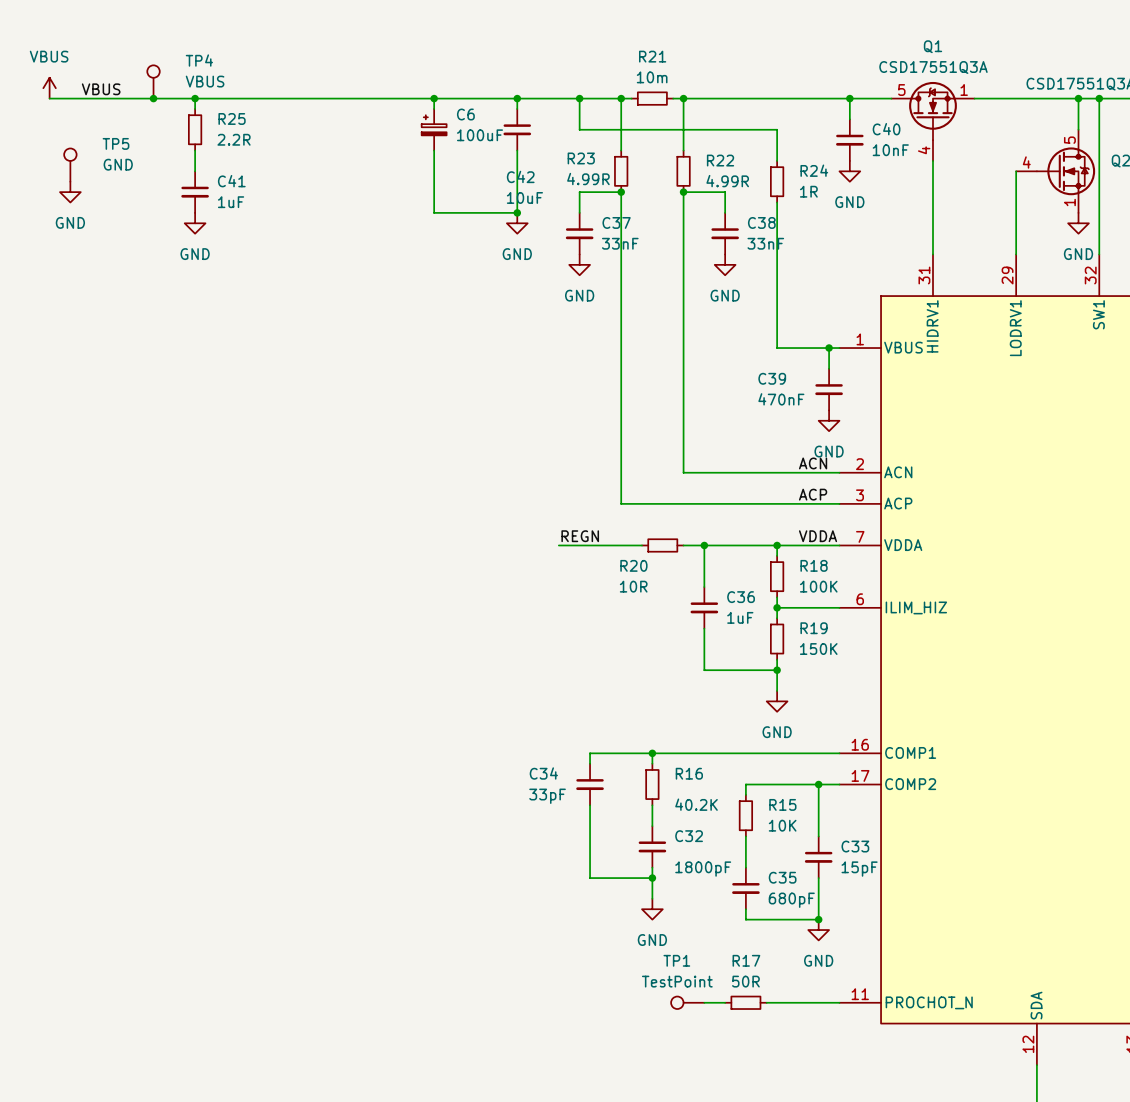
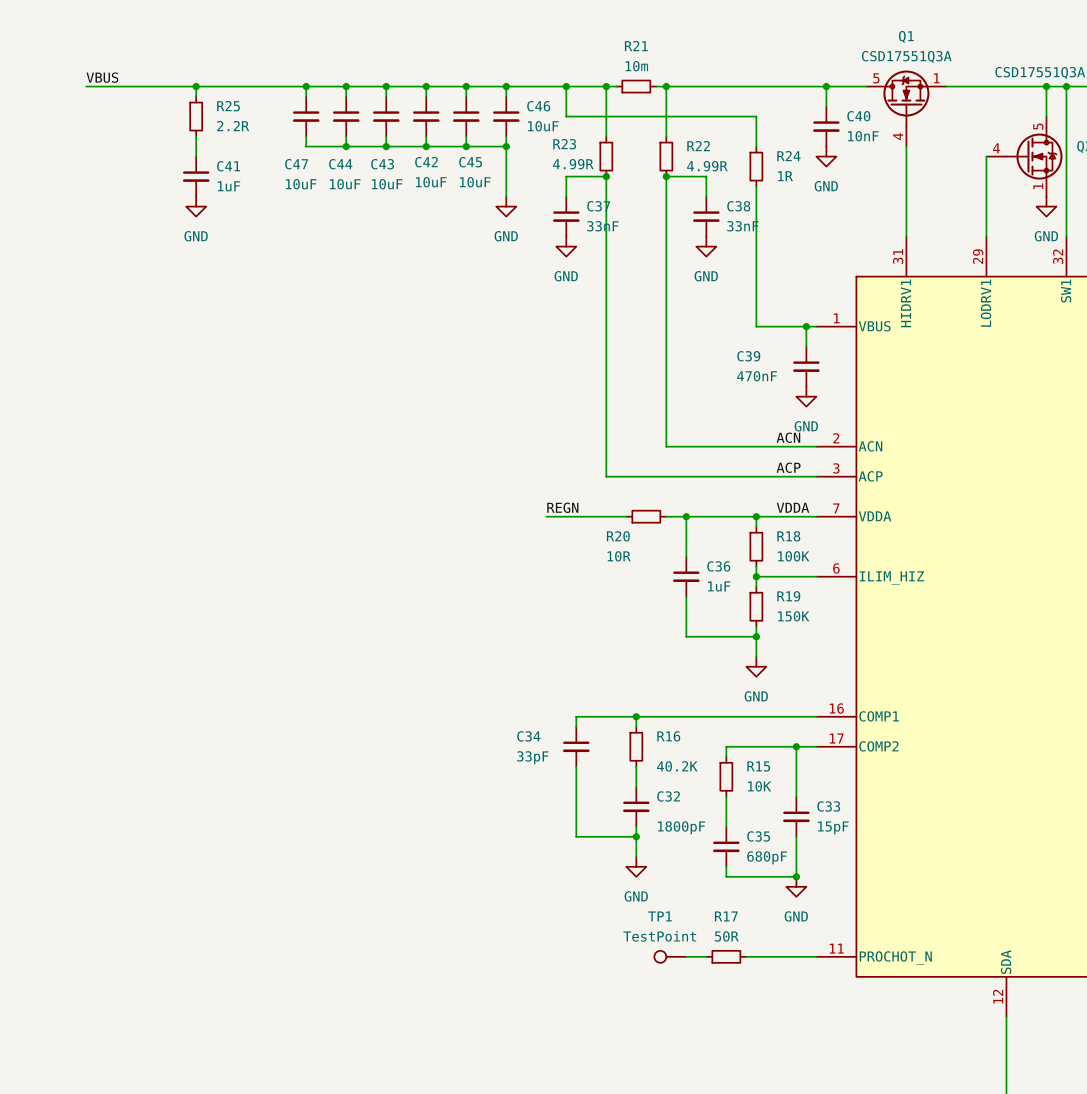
TP4: VBUS (153, 81) -> none
power symbol: VBUS (49, 88) -> none
wire: (49, 98) (80, 98) -> none
junction: (153, 98) -> none
wire: none -> (306, 86) (306, 96)
junction: none -> (306, 86)
wire: none -> (346, 86) (346, 96)
junction: none -> (346, 86)
wire: none -> (386, 86) (386, 96)
junction: none -> (386, 86)
wire: none -> (466, 86) (466, 96)
junction: none -> (466, 86)
C47: none -> 10uF (306, 116)
C44: none -> 10uF (346, 116)
C43: none -> 10uF (386, 116)
C6: 100uF (434, 129) -> none
C42: none -> 10uF (426, 116)
C45: none -> 10uF (466, 116)
wire: none -> (306, 136) (306, 146) (506, 146)
wire: none -> (346, 136) (346, 146)
wire: none -> (386, 136) (386, 146)
wire: none -> (466, 136) (466, 146)
junction: none -> (346, 146)
junction: none -> (386, 146)
wire: (434, 160) (434, 212) (517, 212) -> none
junction: none -> (426, 146)
junction: none -> (466, 146)
junction: none -> (506, 146)
TP5: GND (70, 165) -> none
C42 name: C42 (520, 176) -> C46 (538, 106)
power symbol: GND (70, 192) -> none
C42 value position: 10uF (524, 197) -> 10uF (543, 126)
junction: (517, 212) -> none

